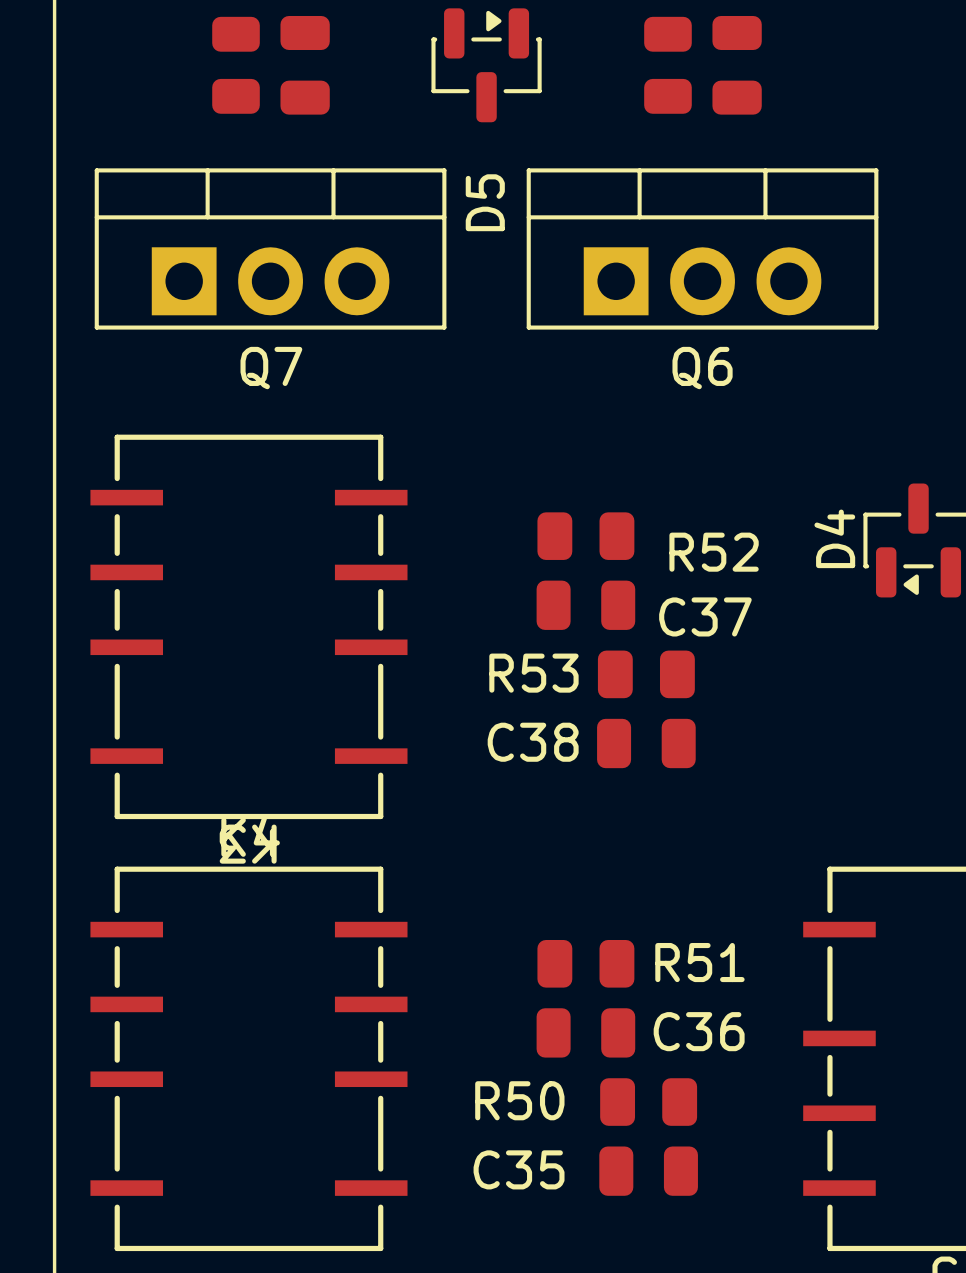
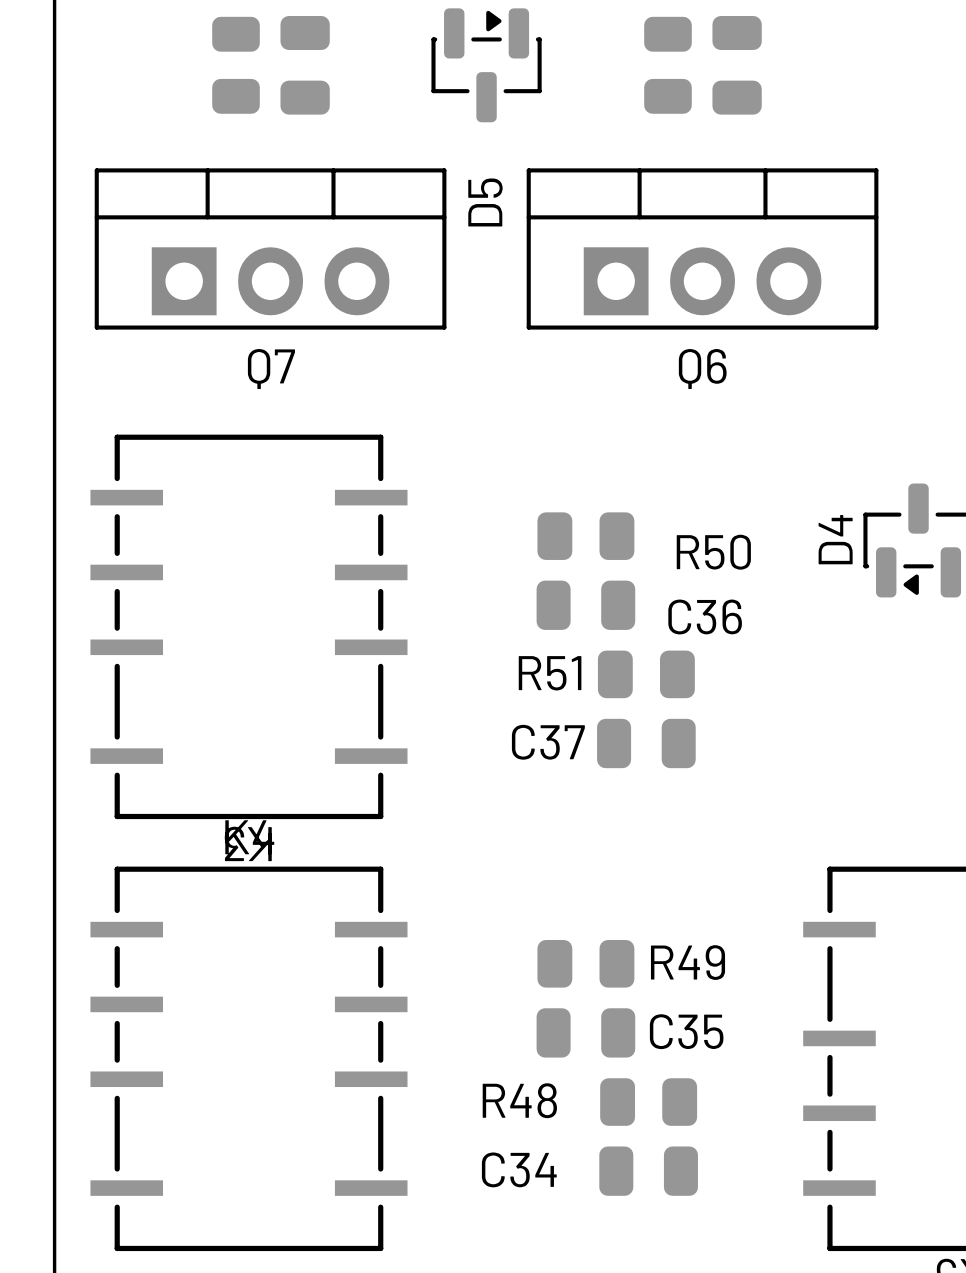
R52 name: R52 (714, 552) -> R50 (713, 552)
C37 name: C37 (705, 616) -> C36 (705, 616)
R53 name: R53 (533, 673) -> R51 (550, 673)
C38 name: C38 (533, 742) -> C37 (548, 742)
R51 name: R51 (699, 962) -> R49 (688, 962)
C36 name: C36 (699, 1031) -> C35 (686, 1031)
R50 name: R50 (519, 1100) -> R48 (519, 1100)
C35 name: C35 (519, 1169) -> C34 (519, 1169)

